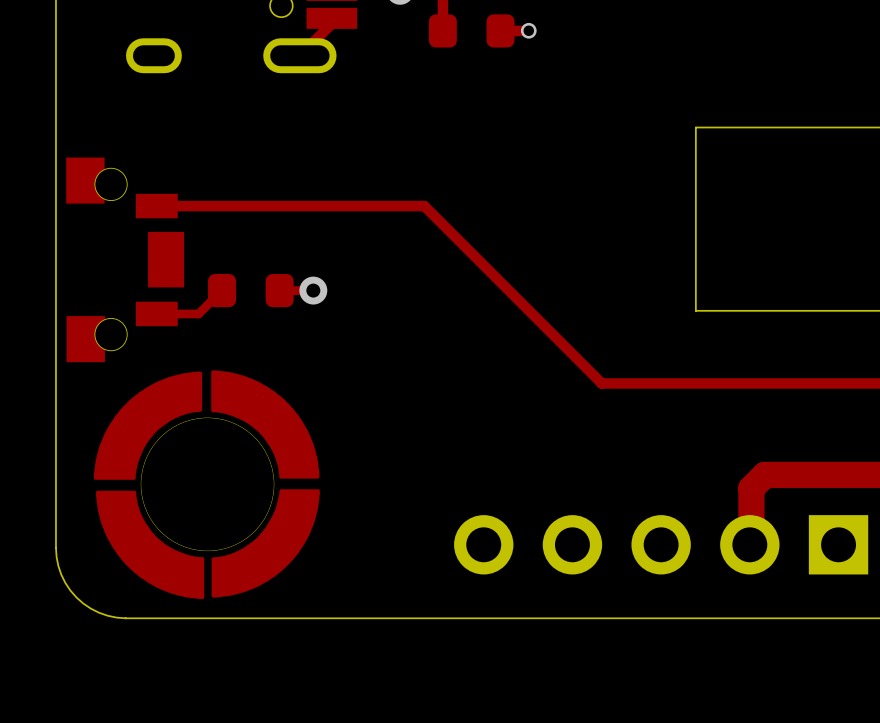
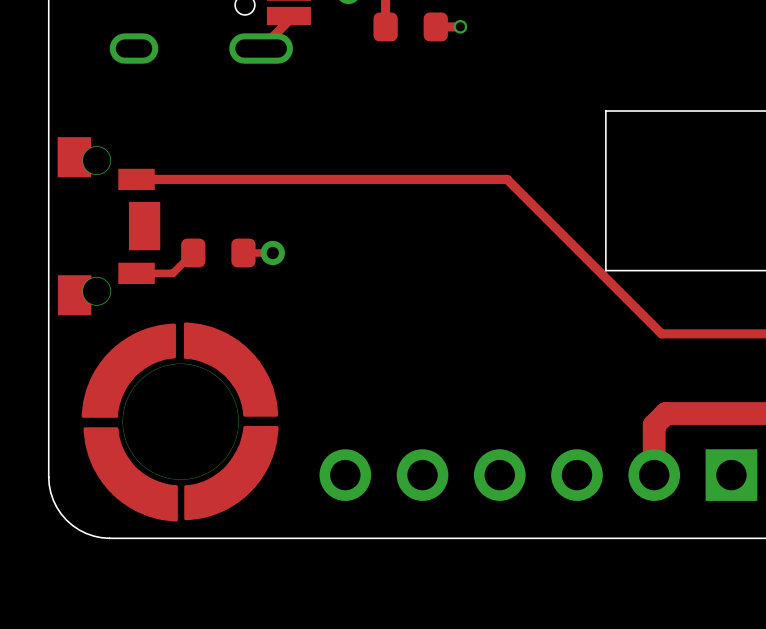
top track: (424, 206) (601, 383) (759, 383) -> (369, 179) (507, 179) (661, 333)
part: (661, 544) -> none
part: none -> (538, 475)

